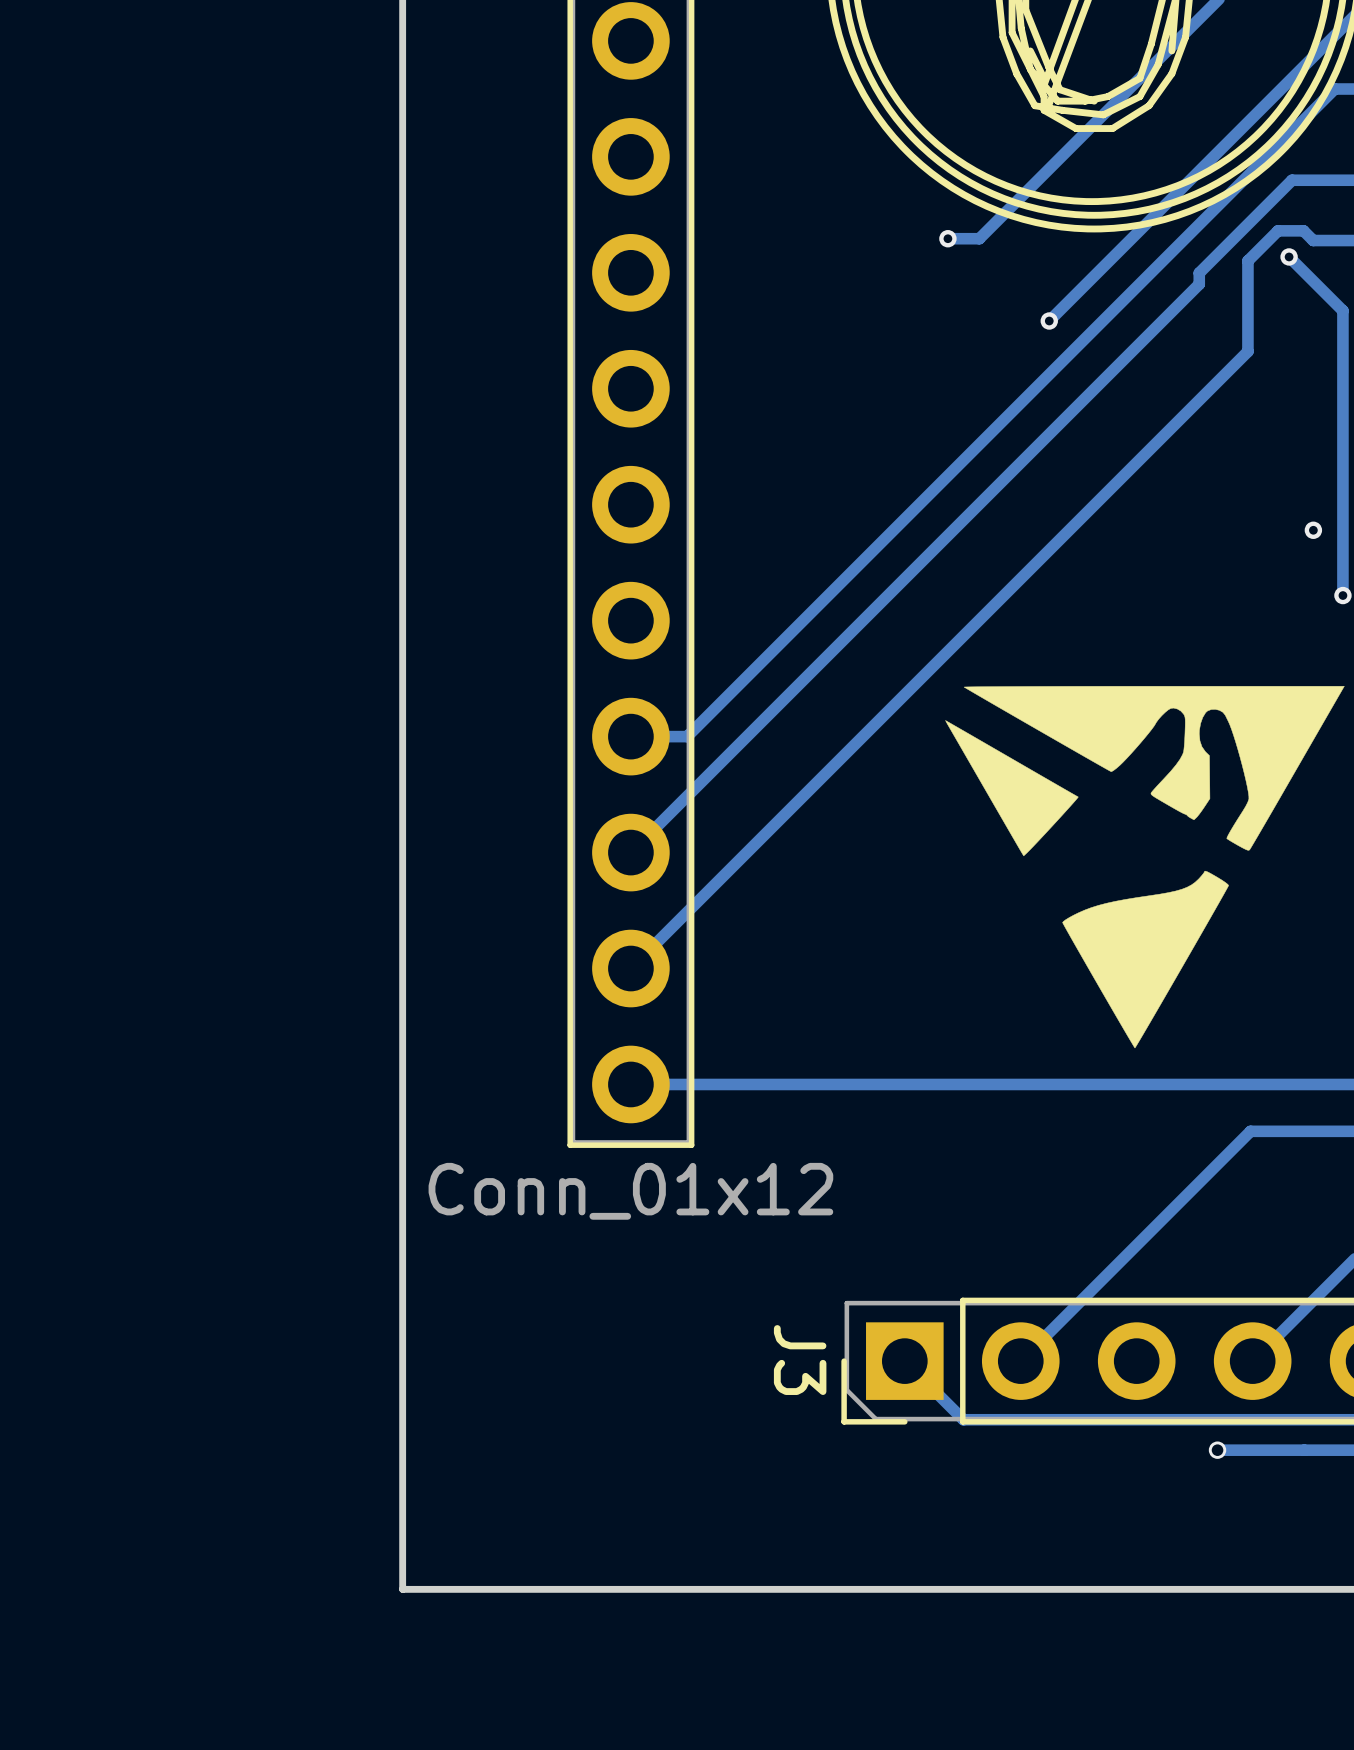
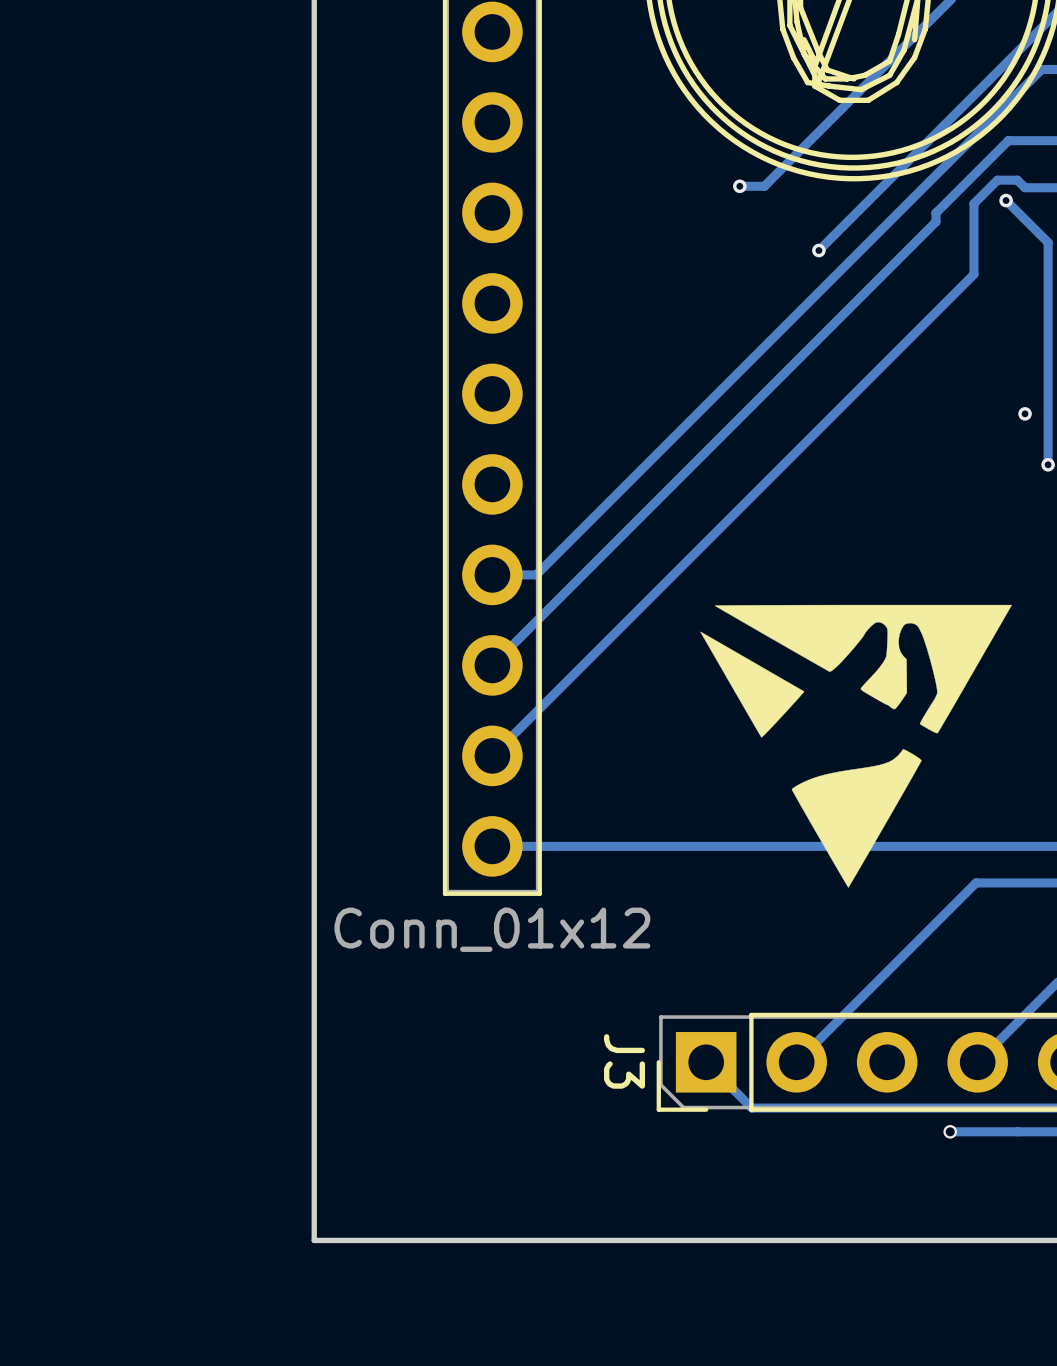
drawing position: (1144, 867) -> (856, 746)

